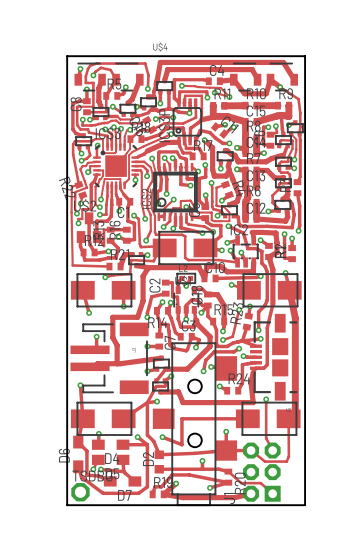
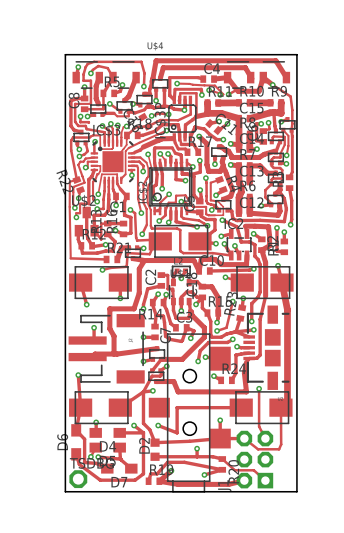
track: none -> (236, 89) (228, 94)
via: none -> (220, 94)
via: (229, 97) -> none
via: none -> (228, 94)
track: (146, 120) (139, 123) (119, 123) (116, 120) (111, 120) (91, 125) -> (88, 122) (88, 122)

